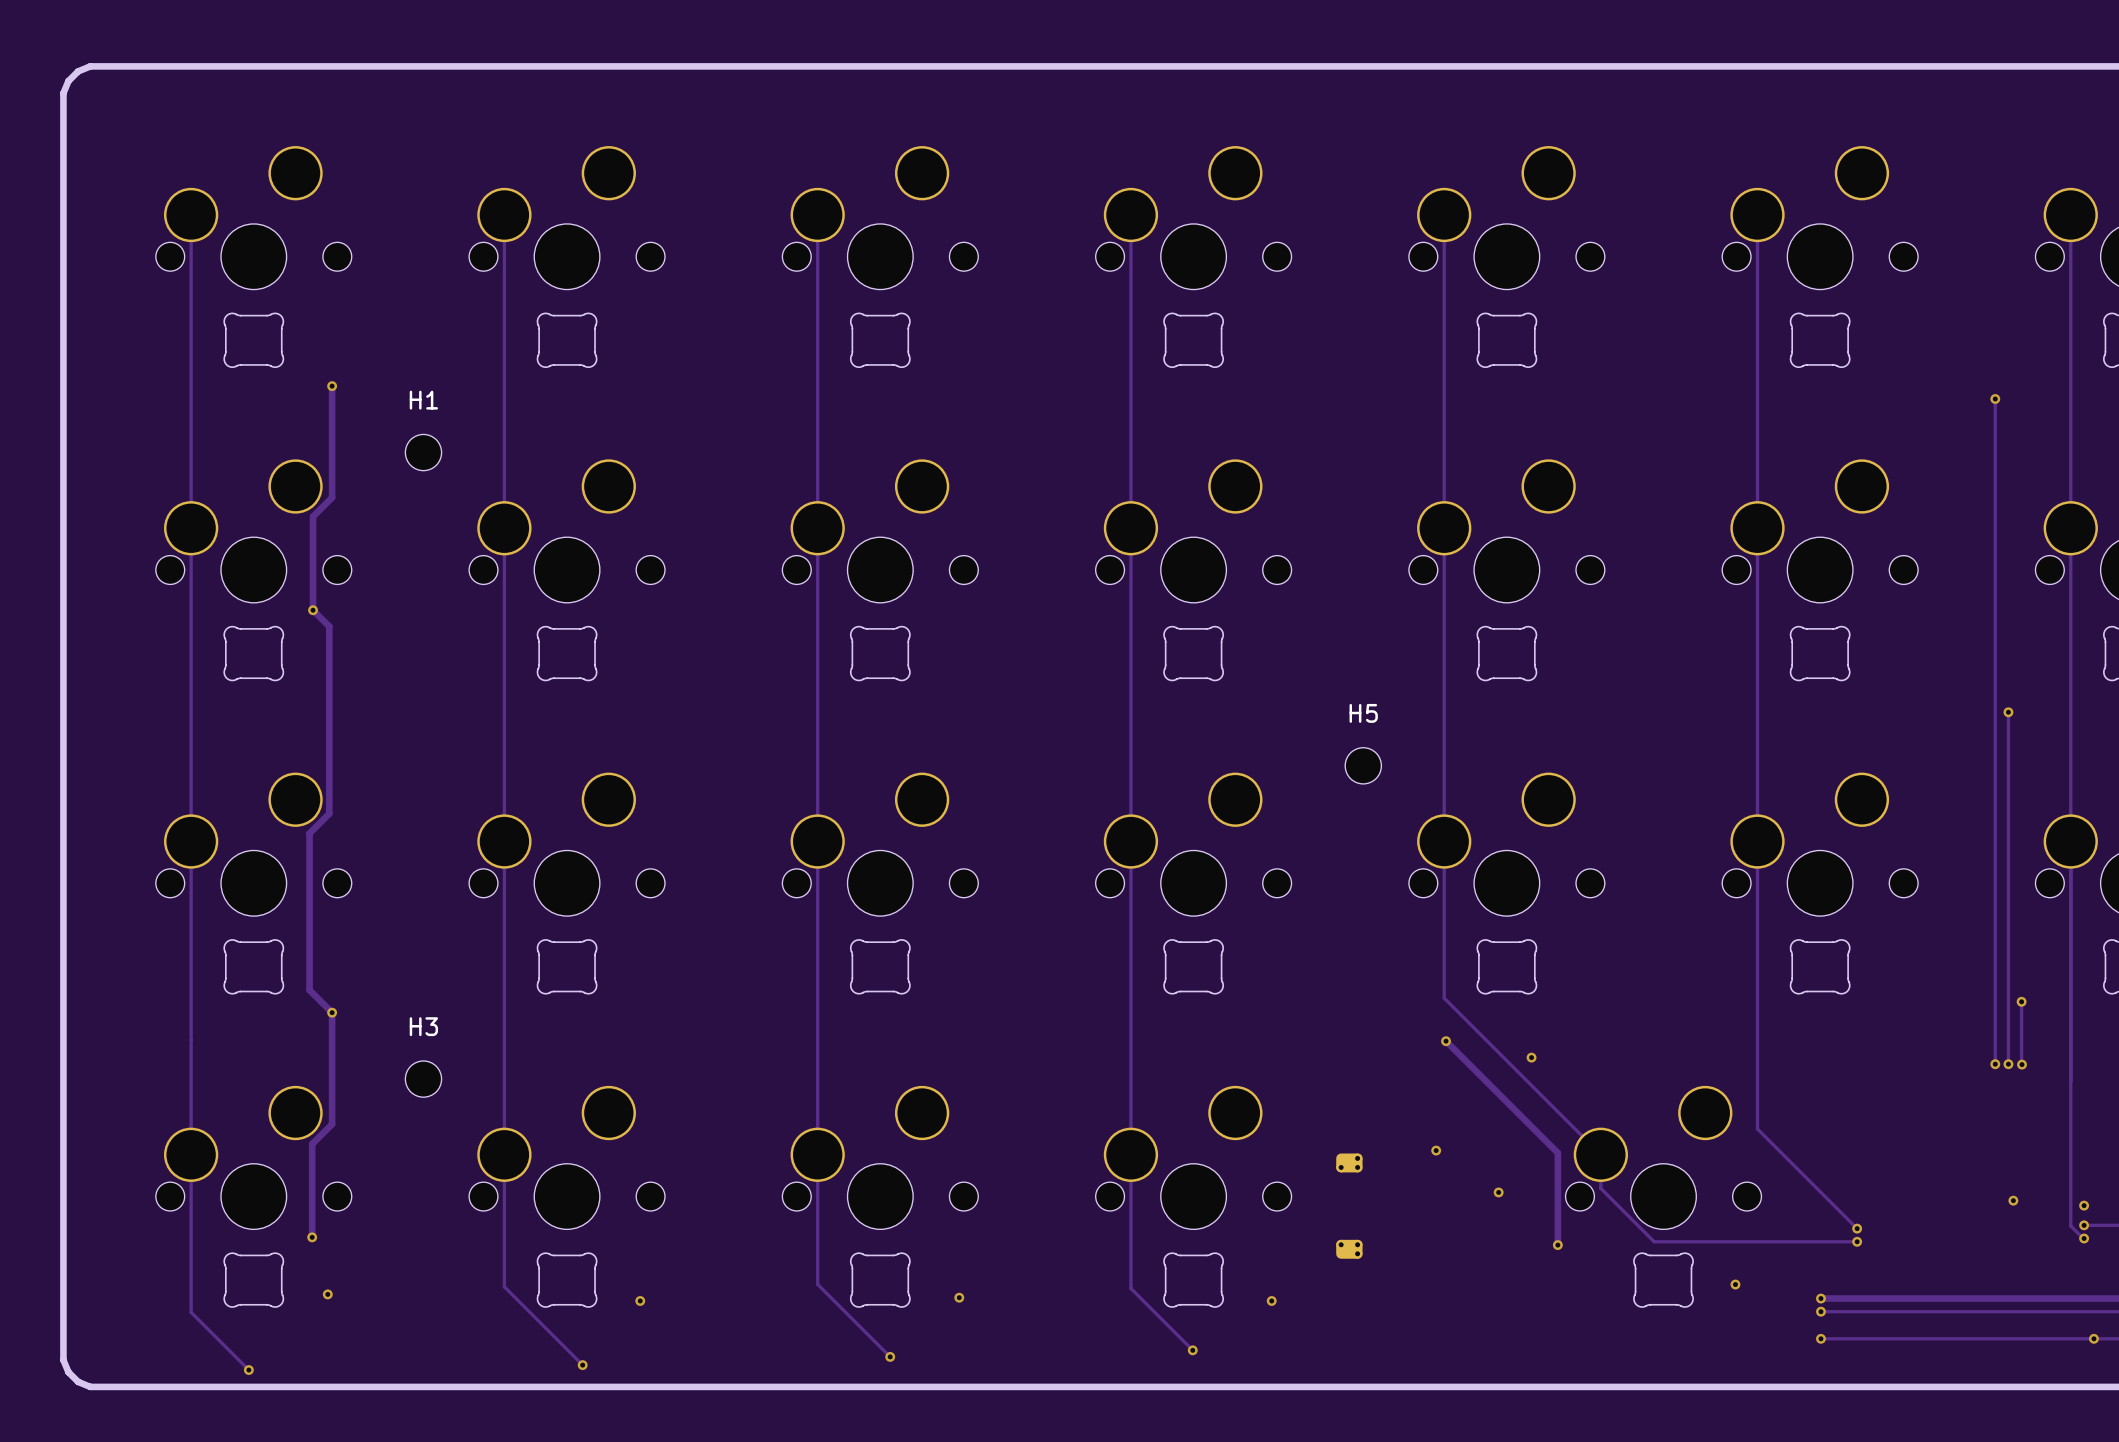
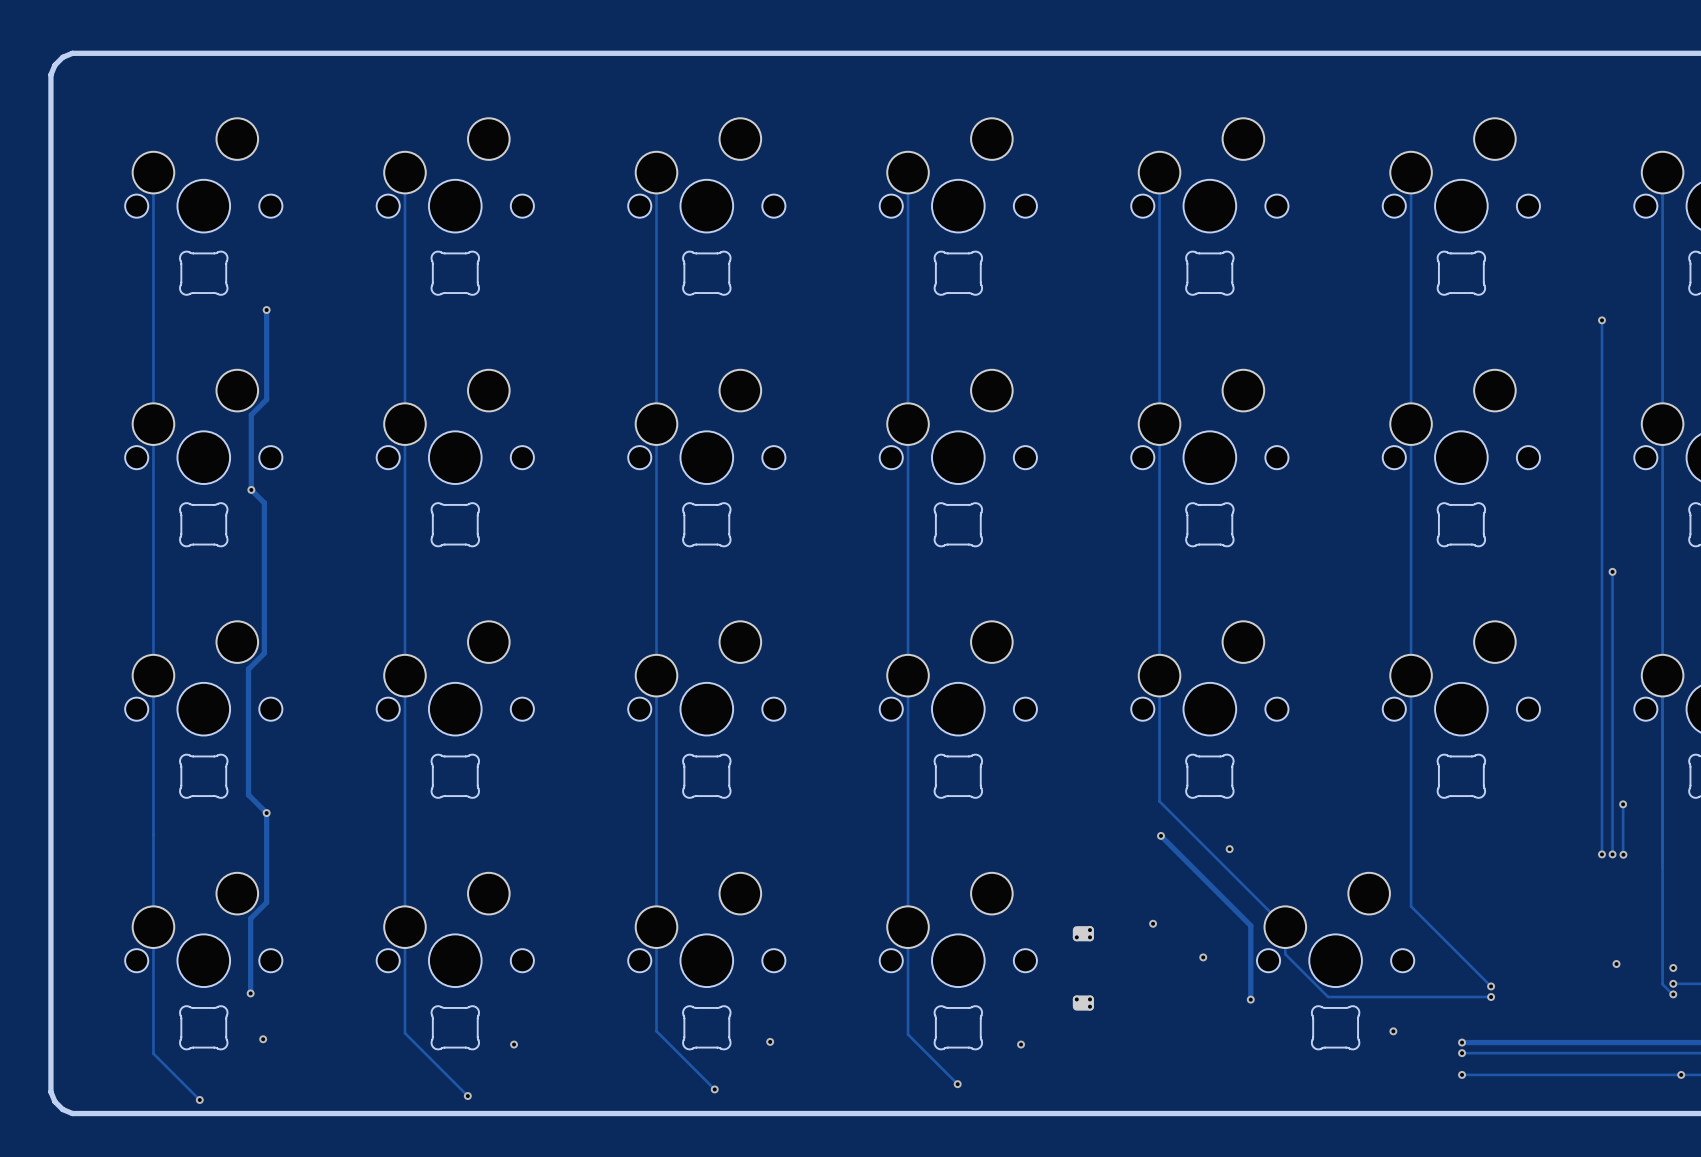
H1: (423, 452) -> none
H5: (1363, 765) -> none
H3: (423, 1079) -> none

